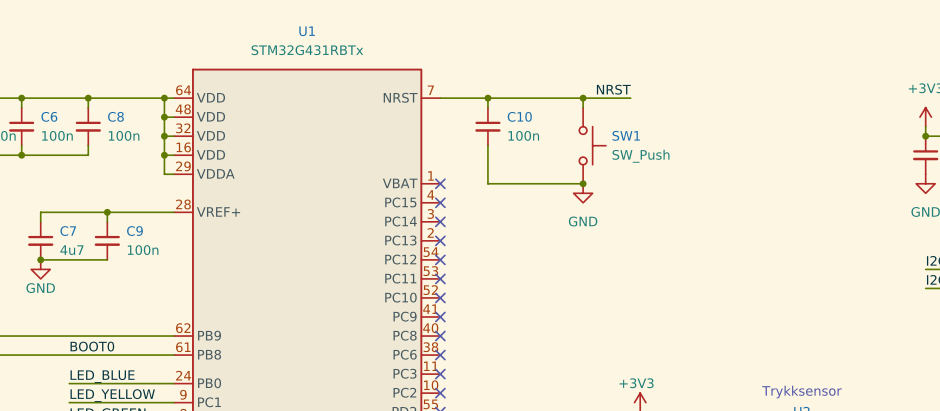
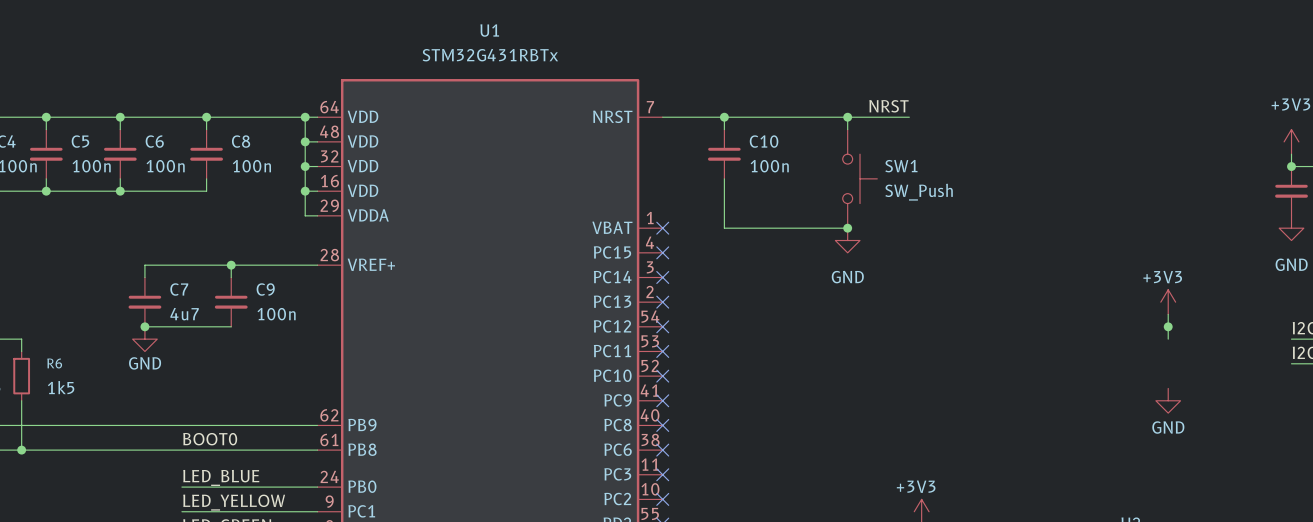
power symbol: none -> +3V3 (1168, 302)
wire: none -> (1168, 314) (1168, 339)
junction: none -> (1168, 326)
power symbol: none -> GND (1168, 400)
text: Trykksensor (801, 392) -> none

